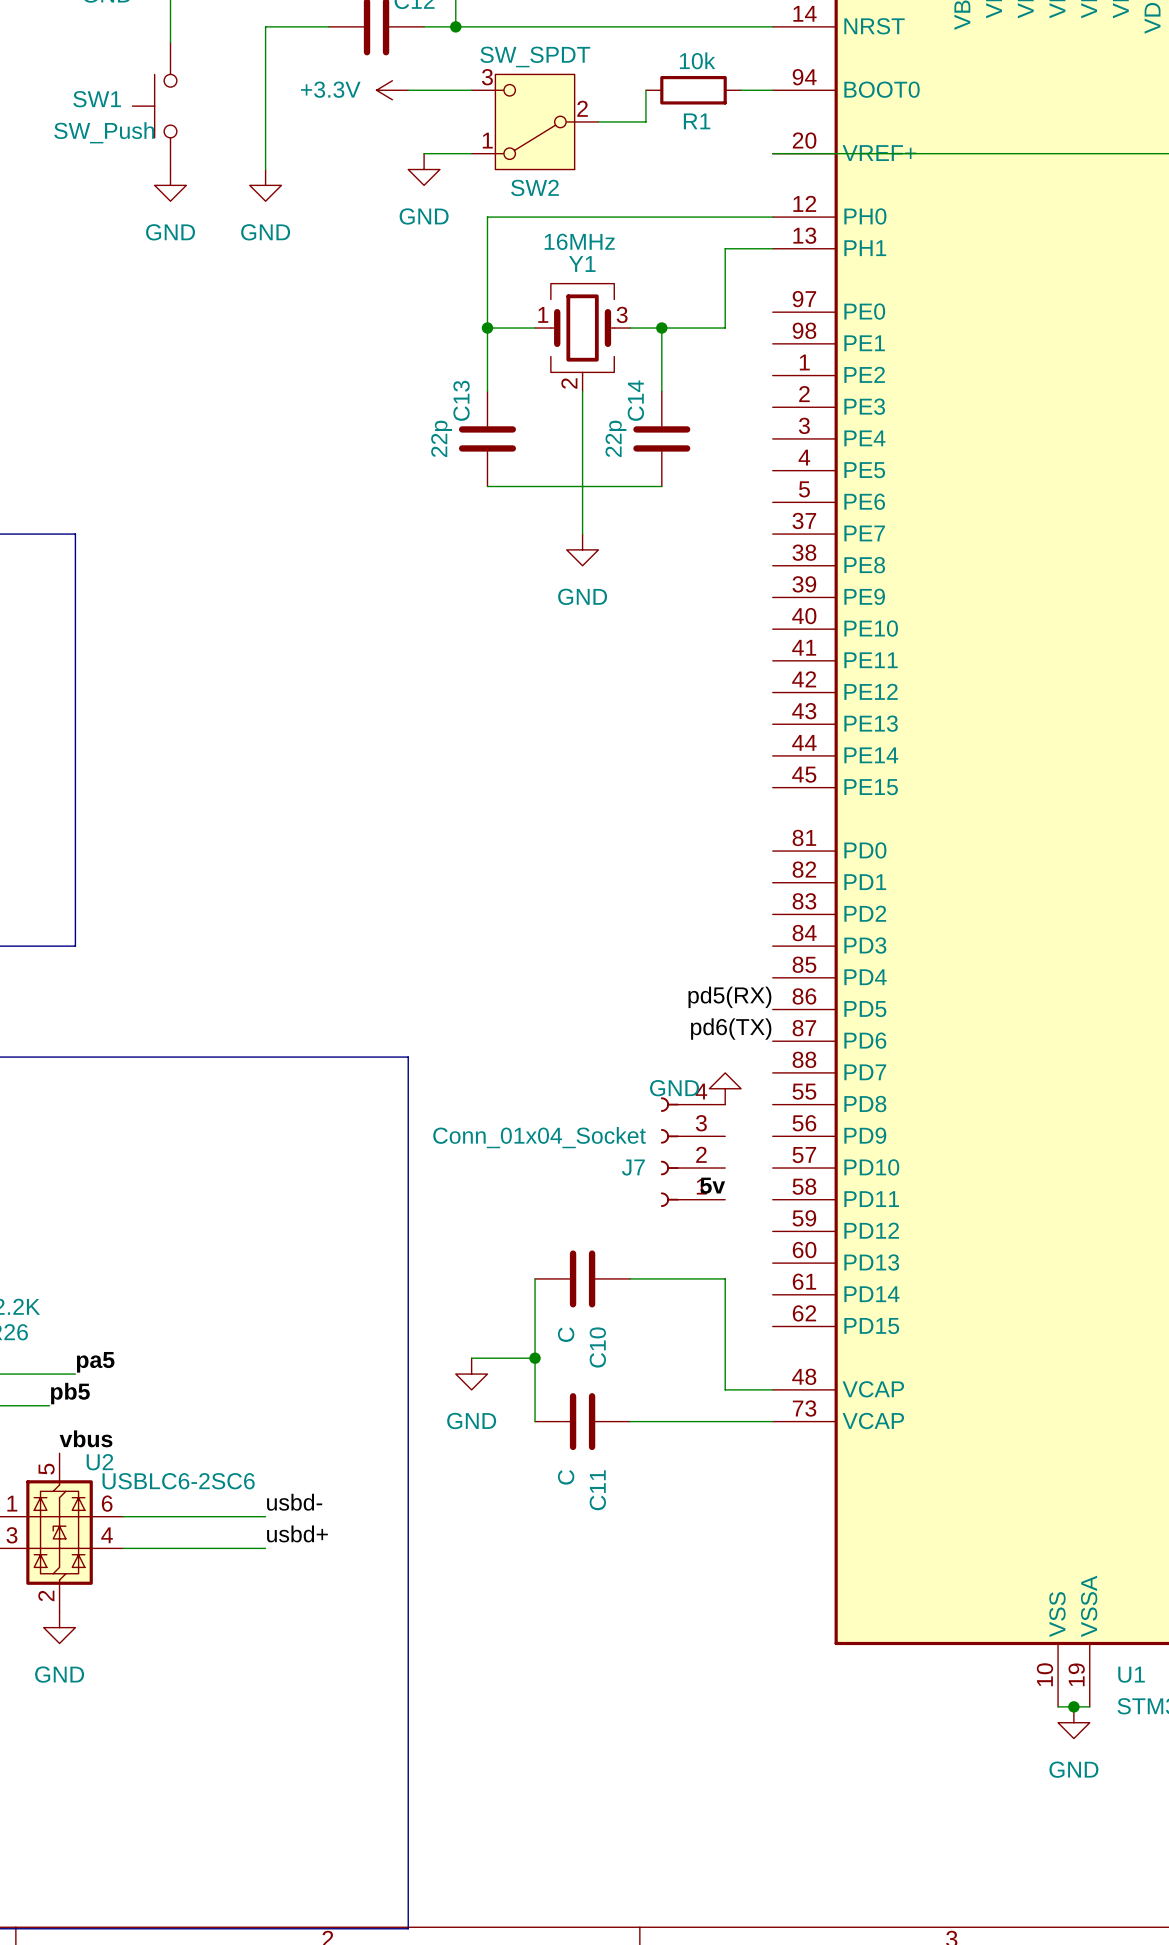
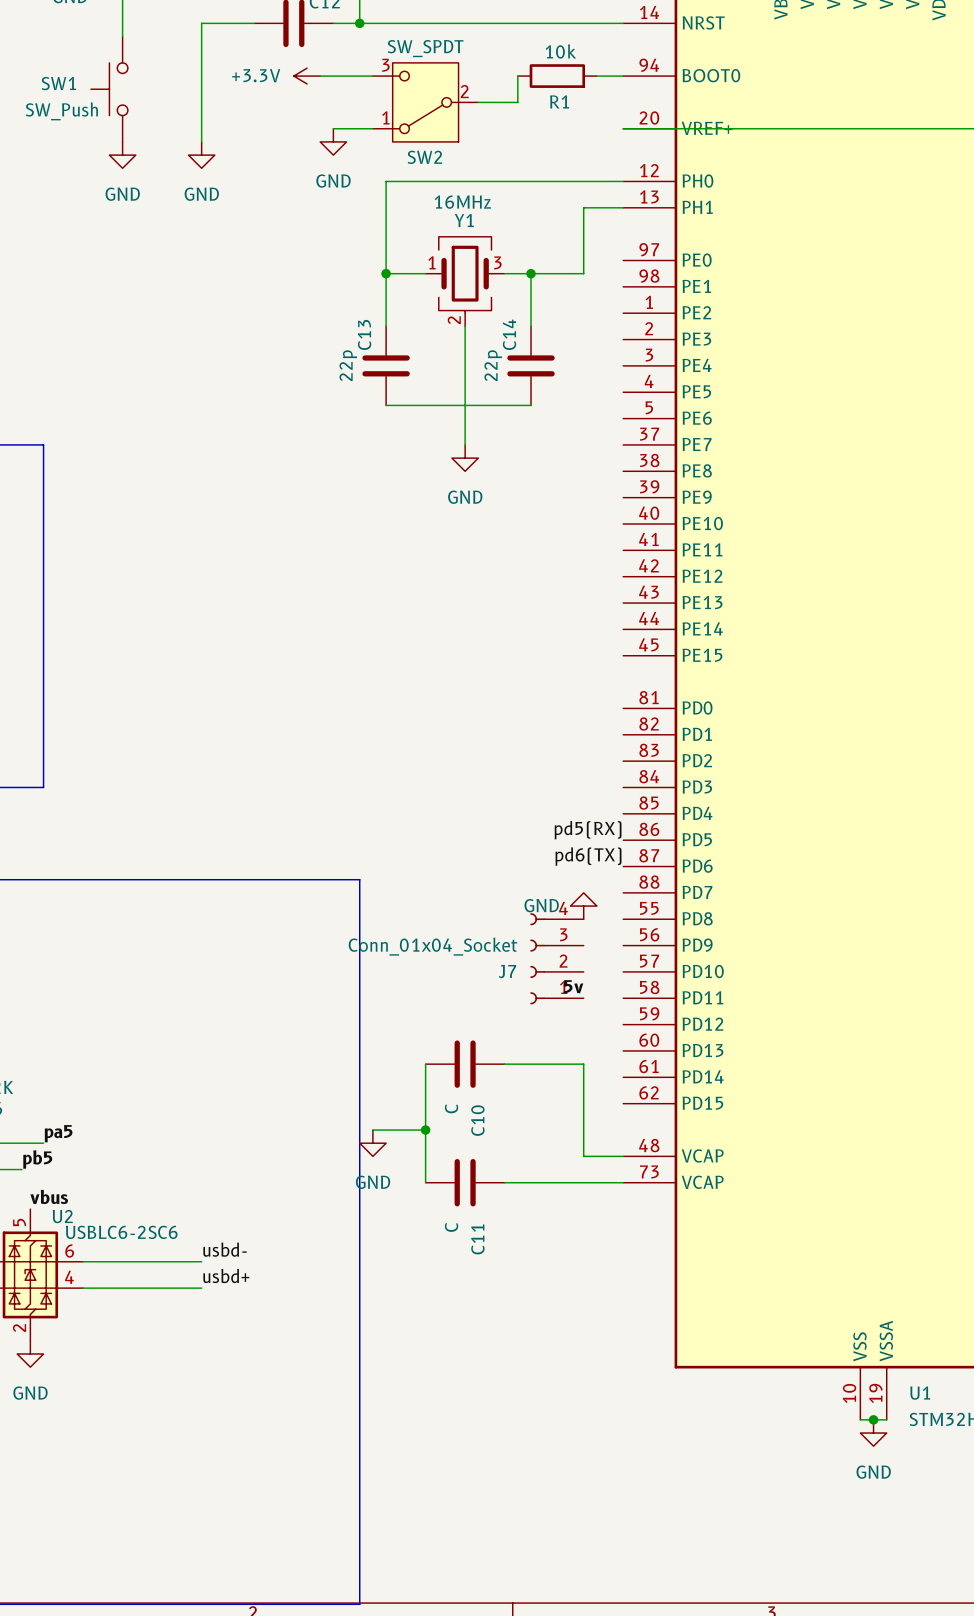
line: (408, 1057) (408, 1928) -> (320, 879) (359, 879) (359, 1604) (320, 1604)

